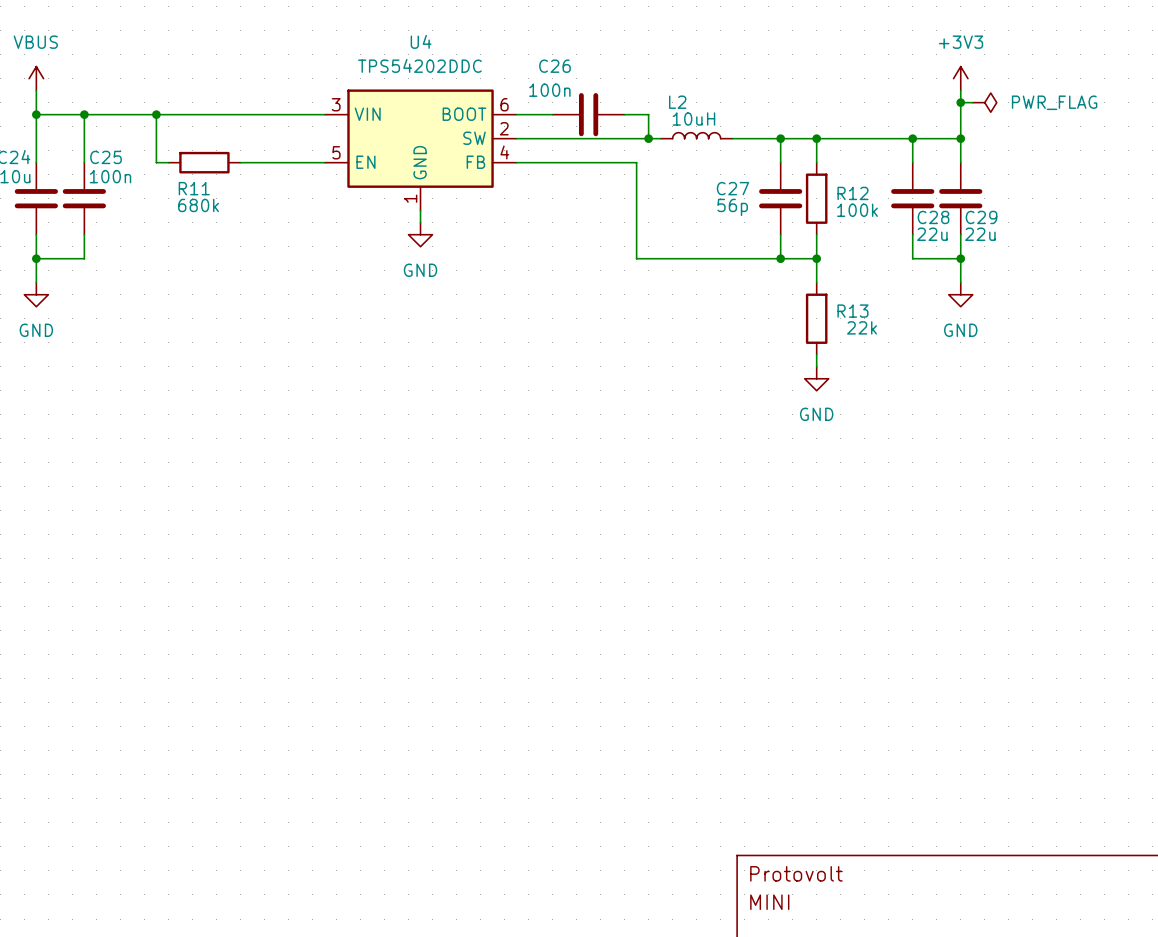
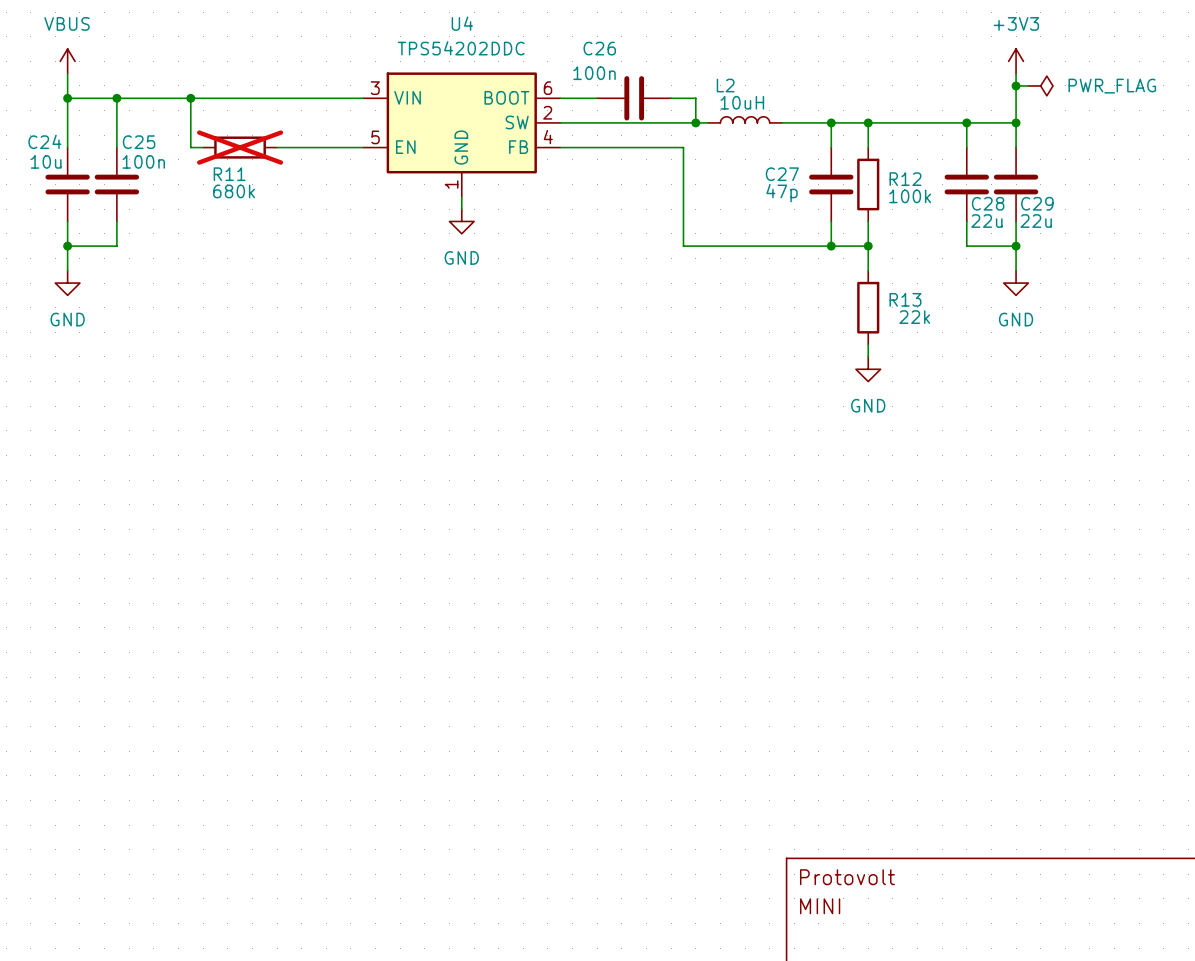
R11 do-not-place cross: none -> (240, 147)
C27 value: 56p (732, 207) -> 47p (782, 193)

